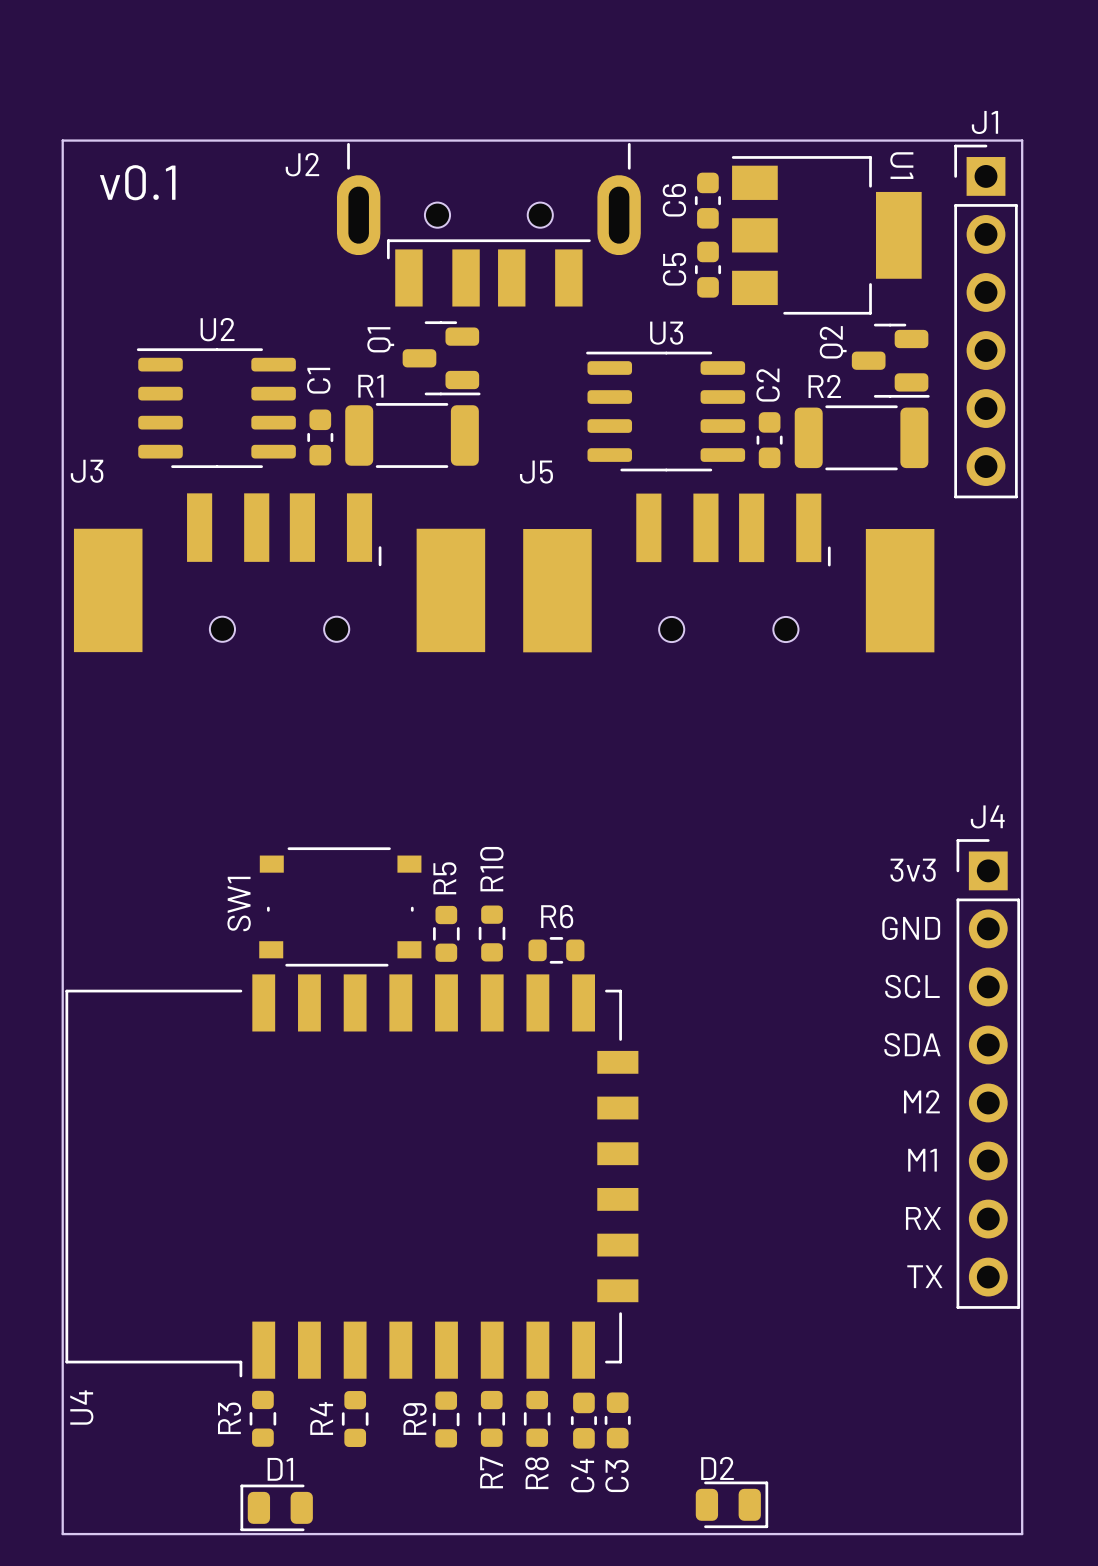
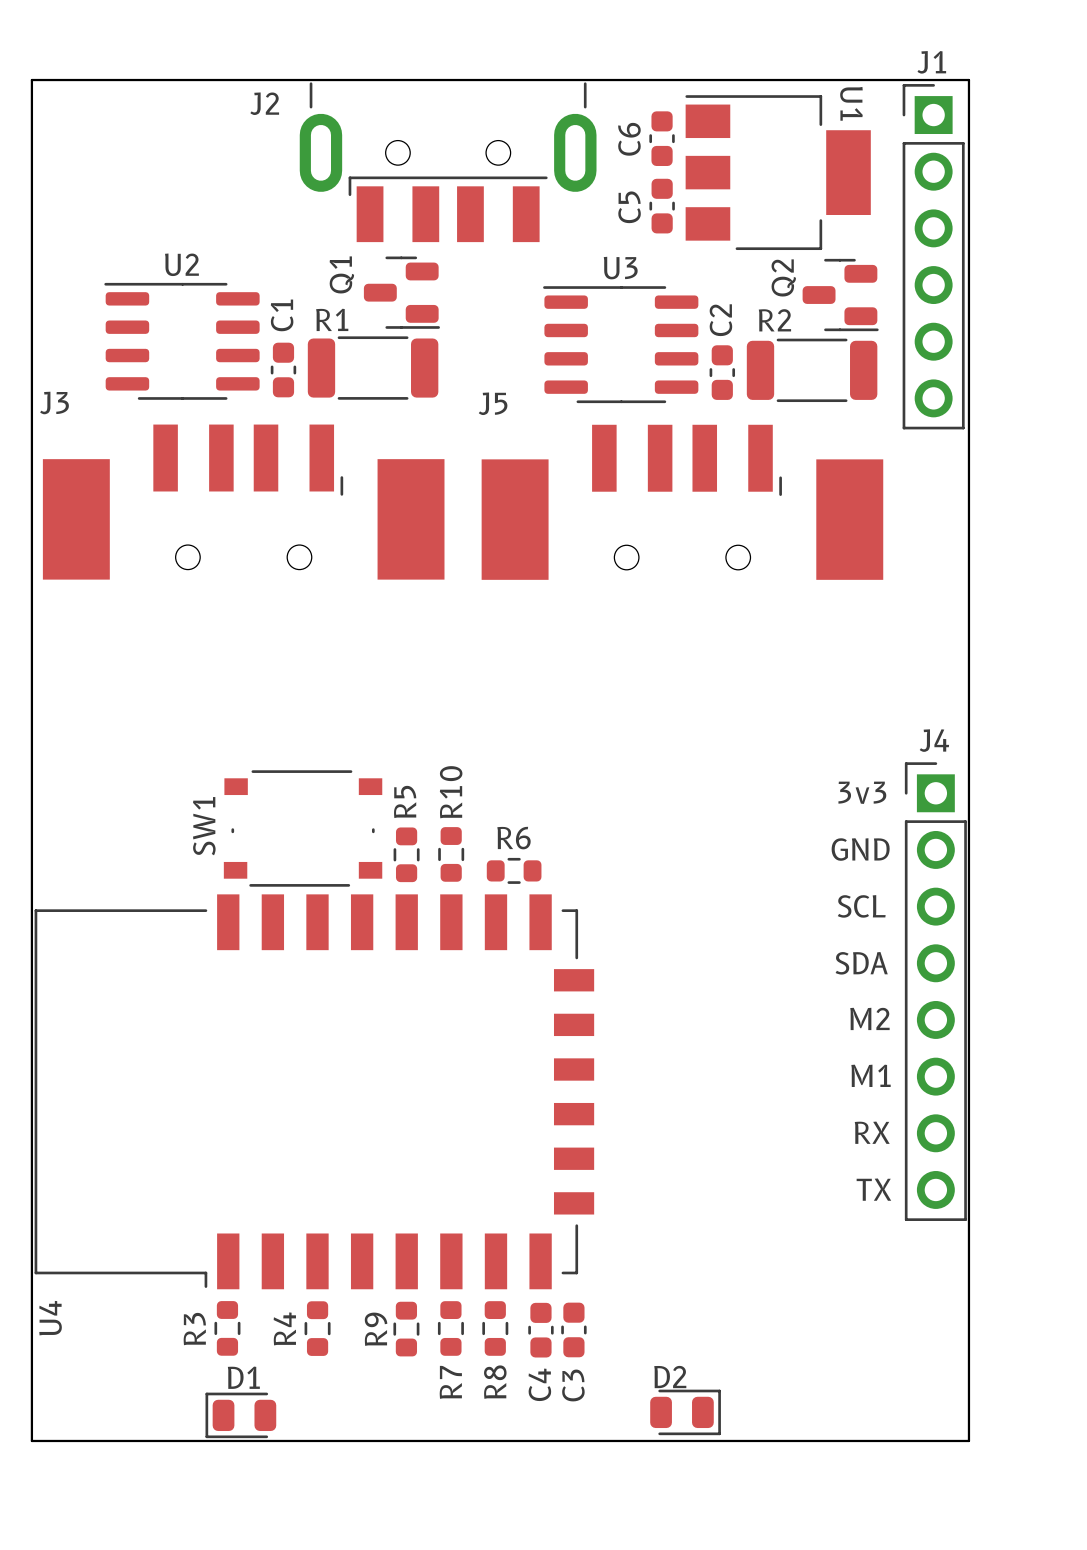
text: v0.1 (137, 182) -> none

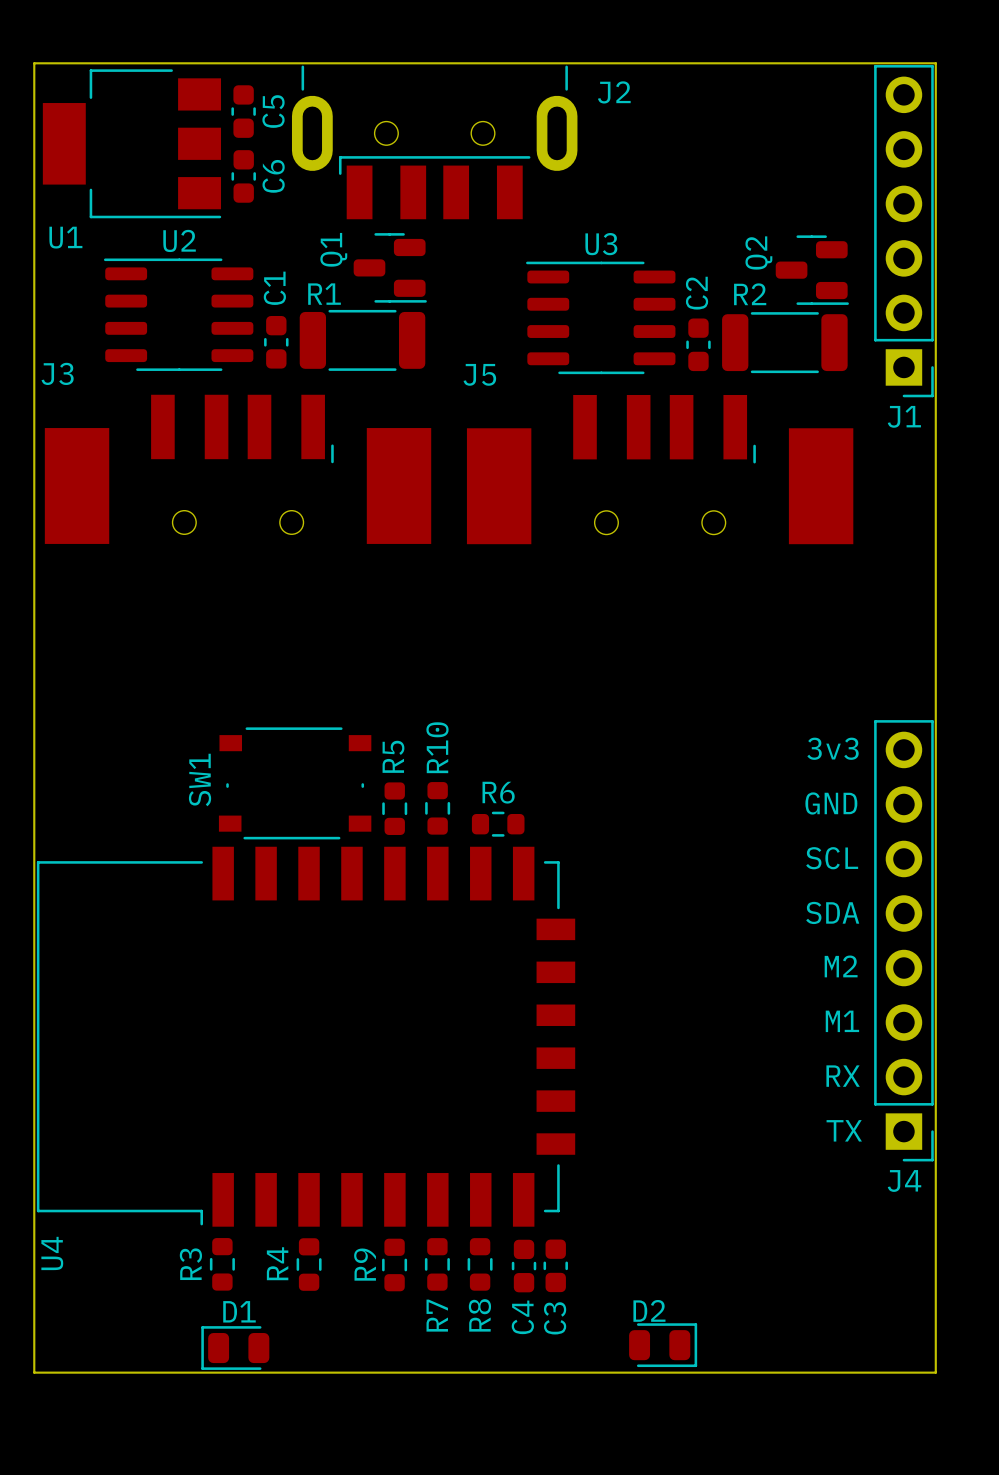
J2 name position: J2 (264, 103) -> J2 (614, 92)
C6 position: (662, 138) -> (243, 176)
C6 name position: C6 (629, 139) -> C6 (273, 176)
U1 rotation: 0° (778, 172) -> 180° (132, 143)
U1 position: (778, 172) -> (132, 143)
C5 position: (662, 206) -> (243, 111)
C5 name position: C5 (629, 207) -> C5 (273, 111)
J1 rotation: 0° (933, 256) -> 180° (903, 231)
J4 rotation: 0° (935, 991) -> 180° (903, 940)

